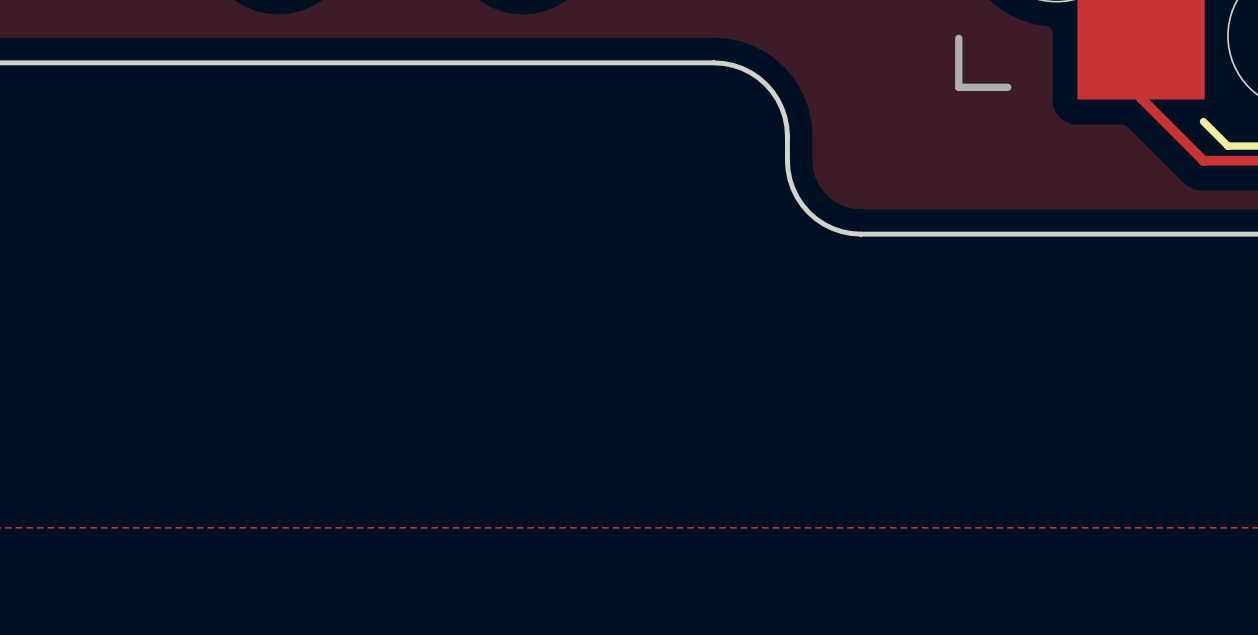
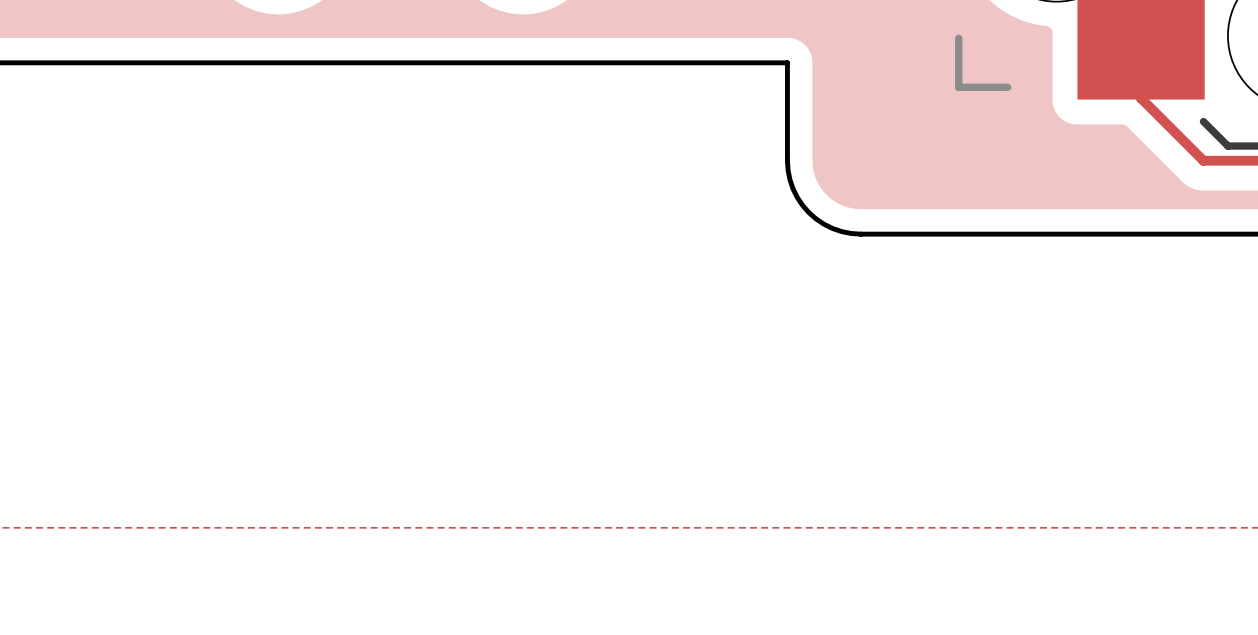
board edge: (714, 62) (742, 68) (765, 84) (781, 108) (787, 136) -> (714, 62) (787, 62) (787, 136)

